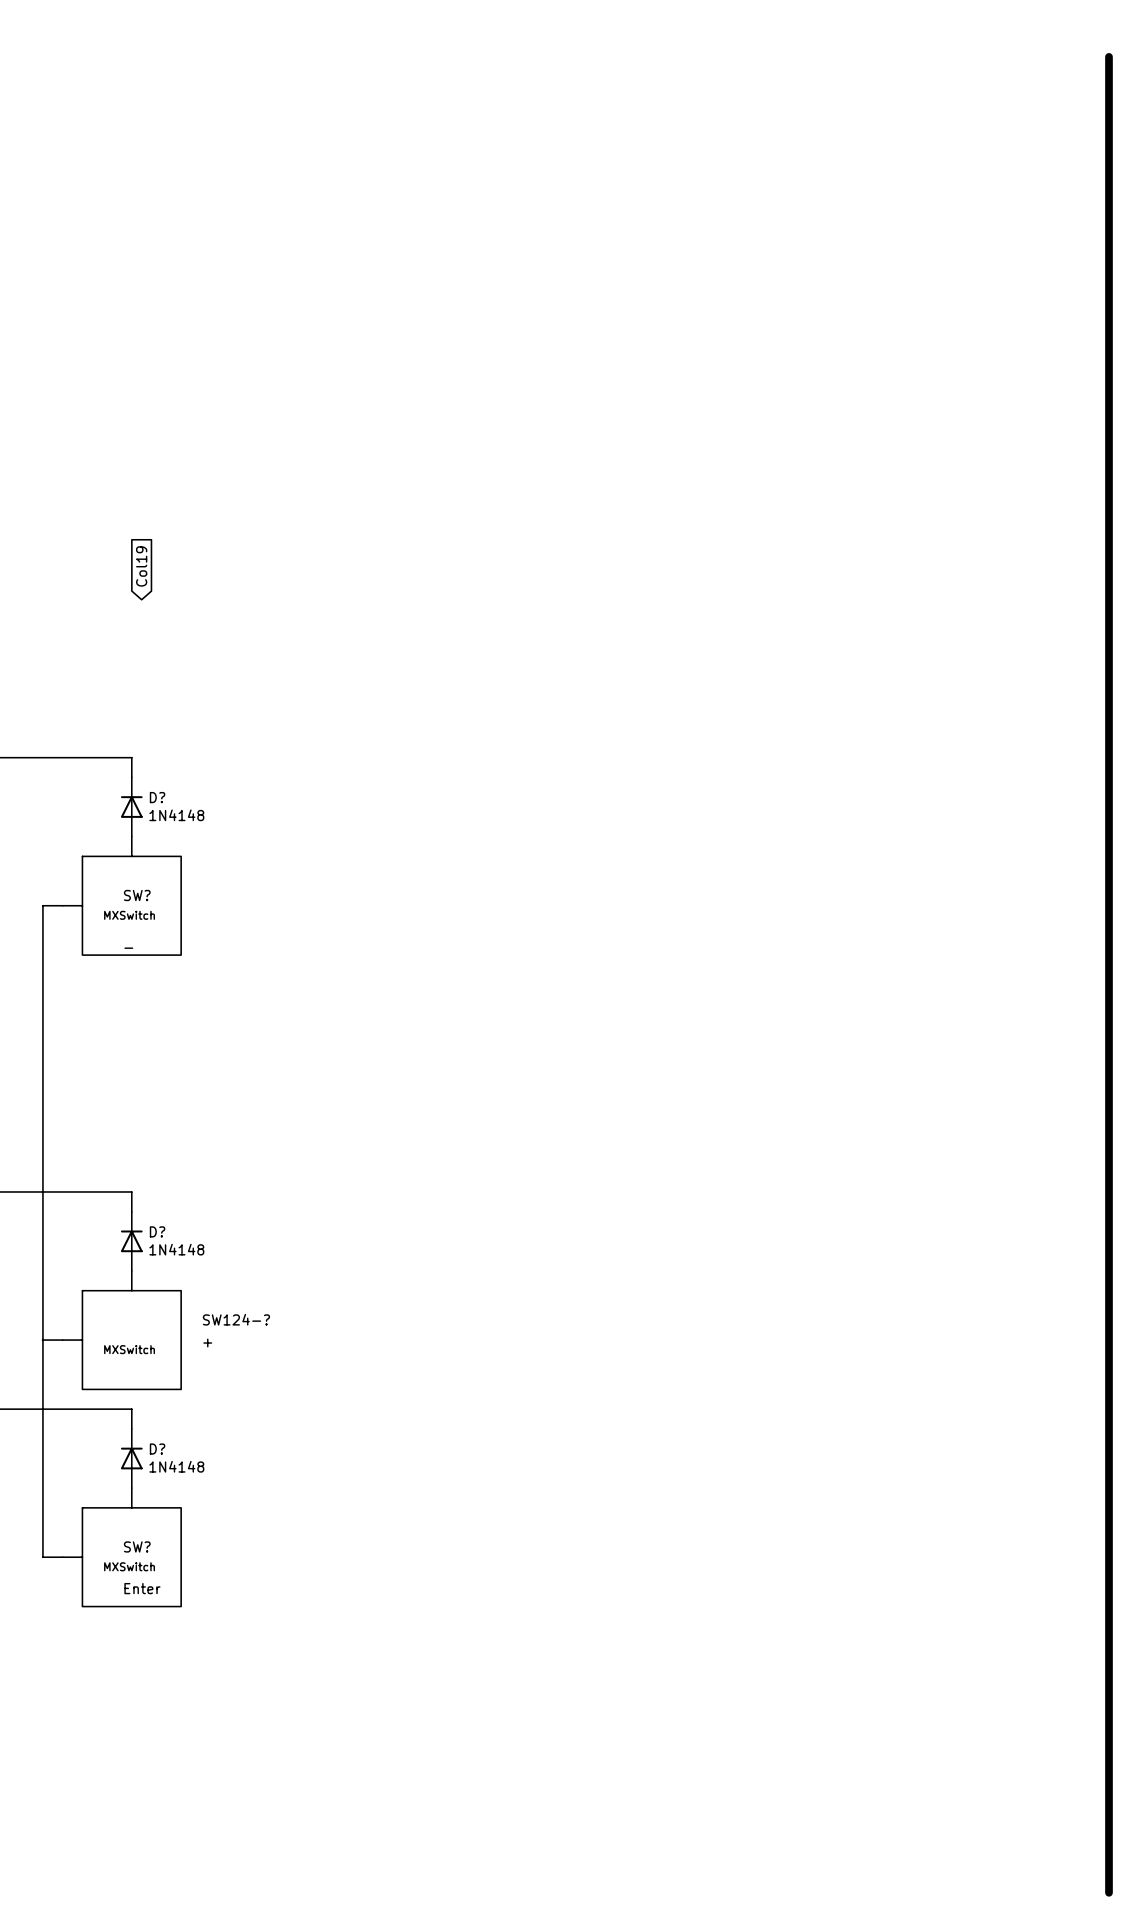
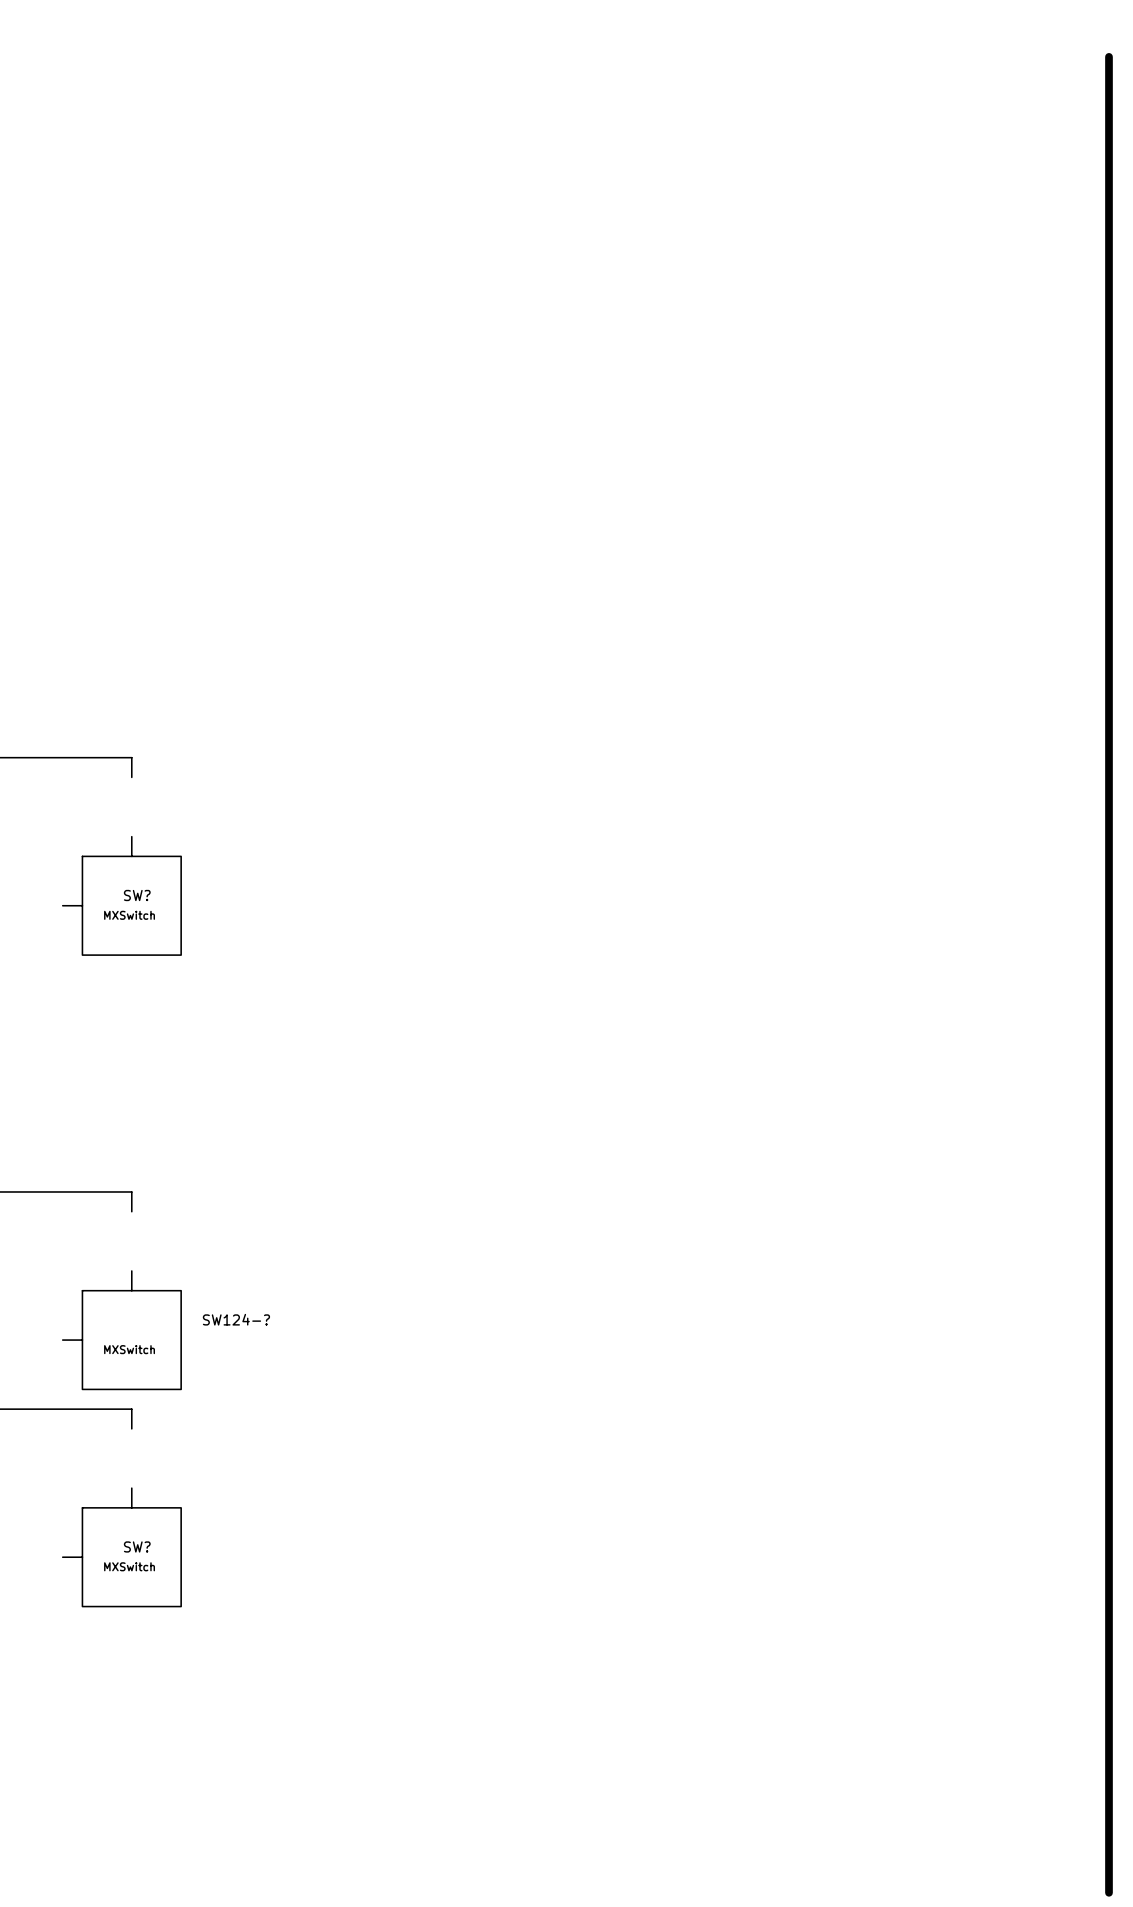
global label: Col19 (141, 566) -> none
D?: 1N4148 (131, 807) -> none
wire: (62, 905) (42, 905) (42, 1557) (62, 1557) -> none
text: - (128, 948) -> none
D?: 1N4148 (131, 1241) -> none
wire: (42, 1340) (62, 1340) -> none
text: + (207, 1343) -> none
D?: 1N4148 (131, 1458) -> none
text: Enter (142, 1588) -> none

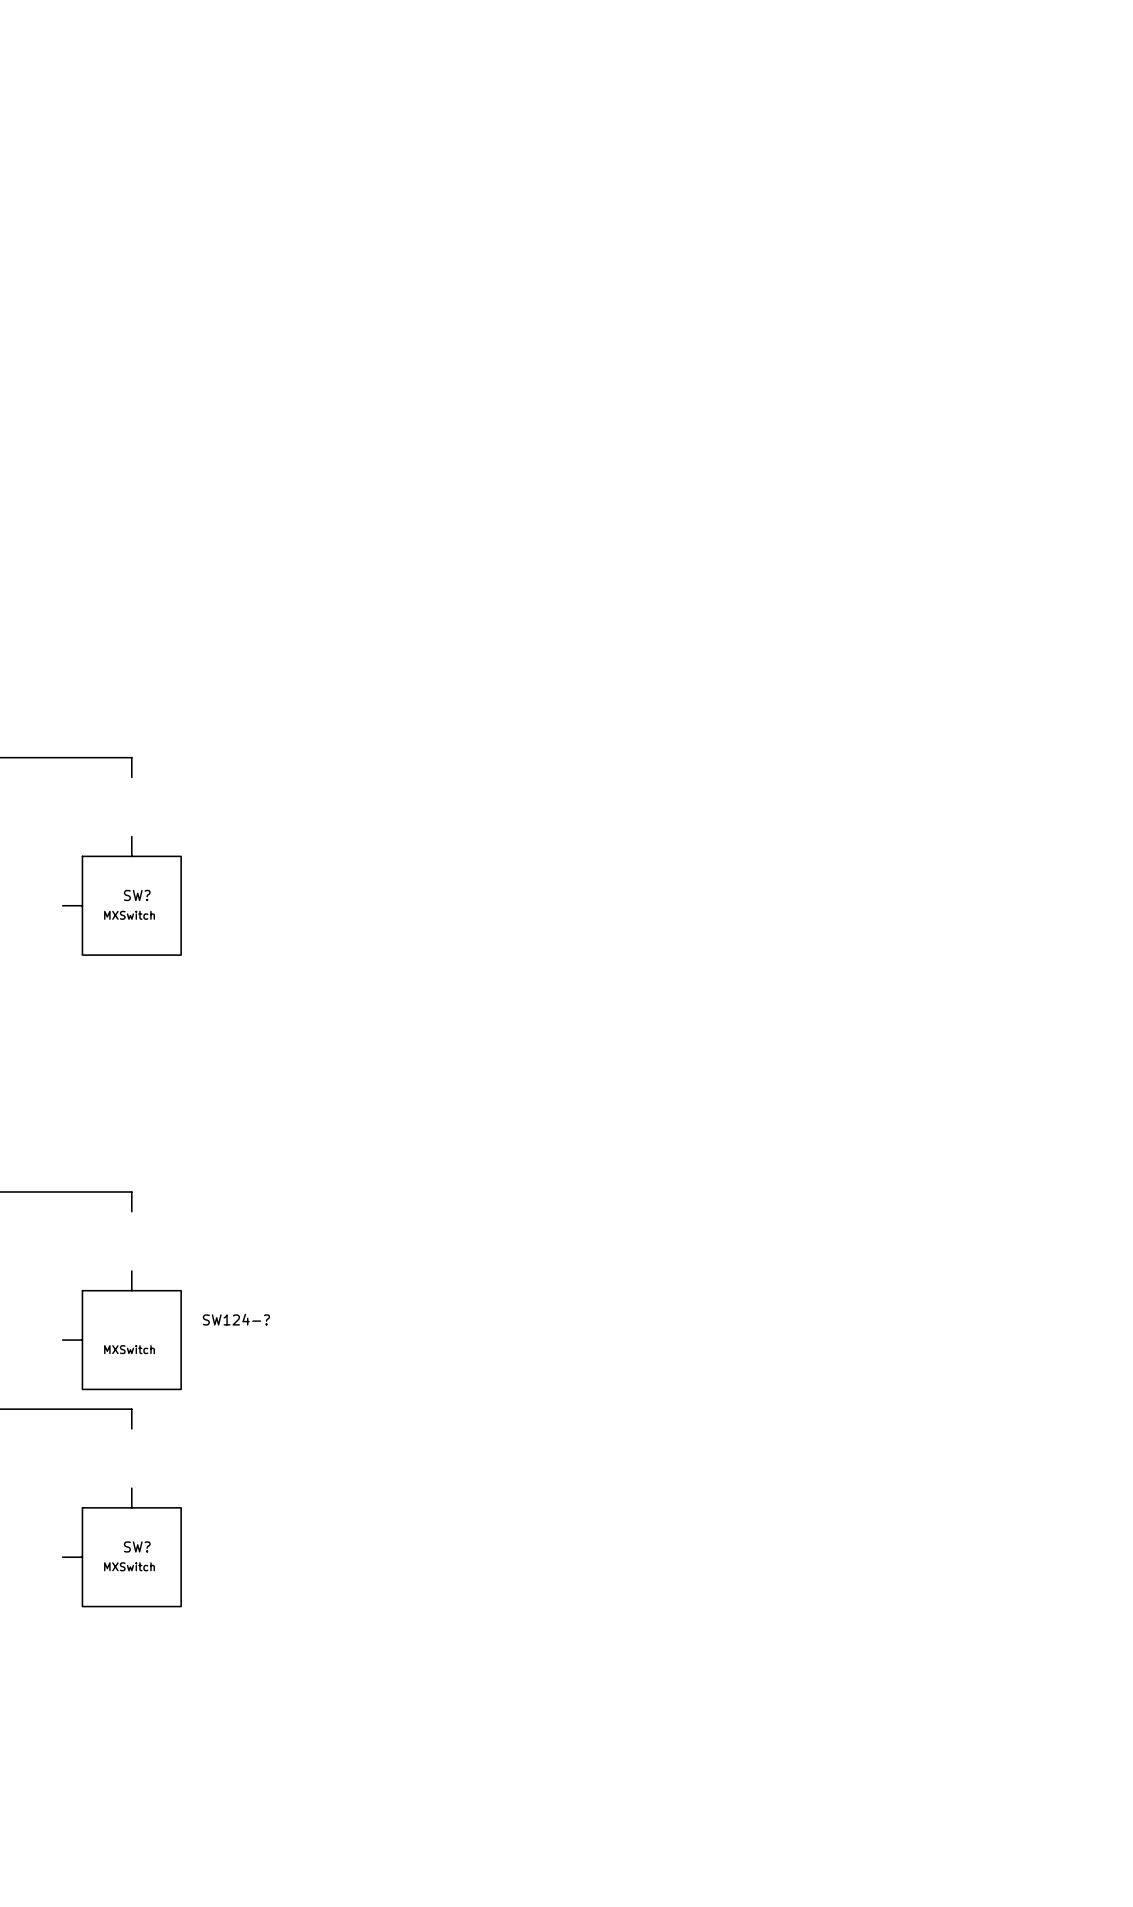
line: (1108, 56) (1108, 1892) -> none

